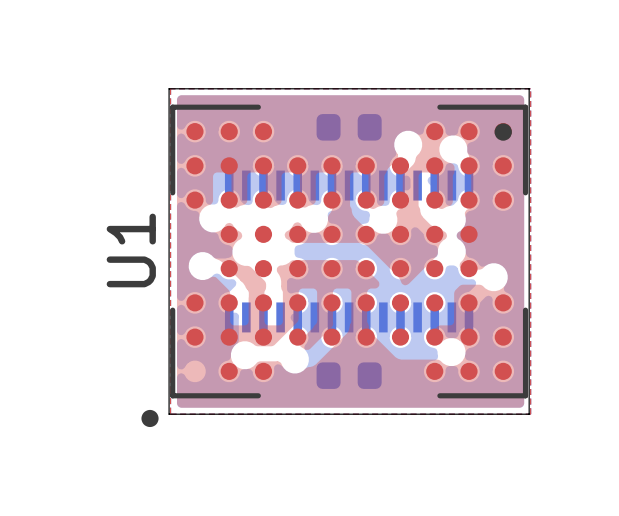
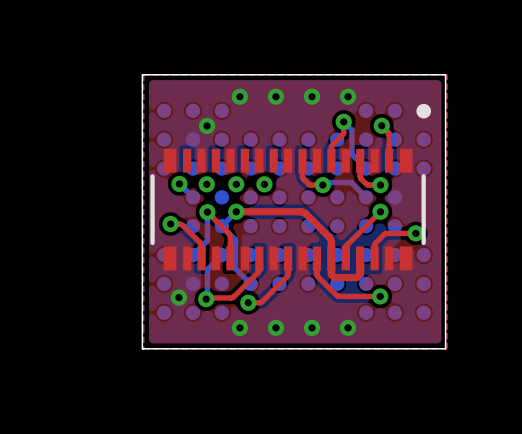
via: none -> (239, 96)
via: none -> (275, 96)
via: none -> (312, 96)
via: none -> (348, 96)
part: (349, 127) -> none
top track: none -> (343, 121) (343, 134) (331, 146) (331, 160)
bottom track: none -> (343, 121) (351, 130) (351, 154) (366, 168)
via: none -> (343, 121)
via: none -> (207, 125)
top track: none -> (381, 125) (388, 133) (389, 160)
via: none -> (381, 125)
part footprint: [224, 170, 474, 333] -> [156, 103, 431, 320]
top track: none -> (302, 160) (303, 178) (310, 184) (322, 185)
top track: none -> (360, 160) (361, 178) (367, 184) (380, 185)
via: none -> (179, 183)
via: none -> (206, 184)
via: none -> (236, 184)
via: none -> (264, 184)
bottom track: none -> (322, 185) (325, 182) (351, 182) (366, 197)
via: none -> (322, 185)
via: none -> (380, 185)
part: none -> (288, 209)
top track: none -> (207, 212) (229, 234) (230, 258)
via: none -> (207, 212)
top track: none -> (236, 211) (305, 213) (330, 239) (331, 274) (334, 277) (357, 277) (360, 274) (360, 258)
bottom track: none -> (236, 211) (221, 226) (235, 239) (235, 268) (250, 283)
via: none -> (236, 211)
top track: none -> (376, 211) (380, 211) (345, 246) (345, 258)
via: none -> (380, 211)
bottom track: none -> (207, 213) (207, 240) (193, 255)
U1: (334, 265) -> none
top track: none -> (170, 224) (182, 225) (199, 242) (201, 246) (201, 258)
via: none -> (170, 224)
top track: none -> (415, 233) (385, 233) (374, 244) (374, 258)
via: none -> (415, 233)
bottom track: none -> (221, 255) (207, 269) (206, 299)
top track: none -> (259, 258) (258, 271) (233, 297) (206, 298)
top track: none -> (288, 258) (287, 276) (261, 302) (248, 302)
top track: none -> (316, 258) (317, 275) (337, 295) (380, 296)
via: none -> (380, 296)
via: none -> (178, 297)
via: none -> (206, 299)
via: none -> (248, 302)
part: (349, 375) -> none
via: none -> (239, 327)
via: none -> (275, 327)
via: none -> (312, 327)
via: none -> (348, 327)

